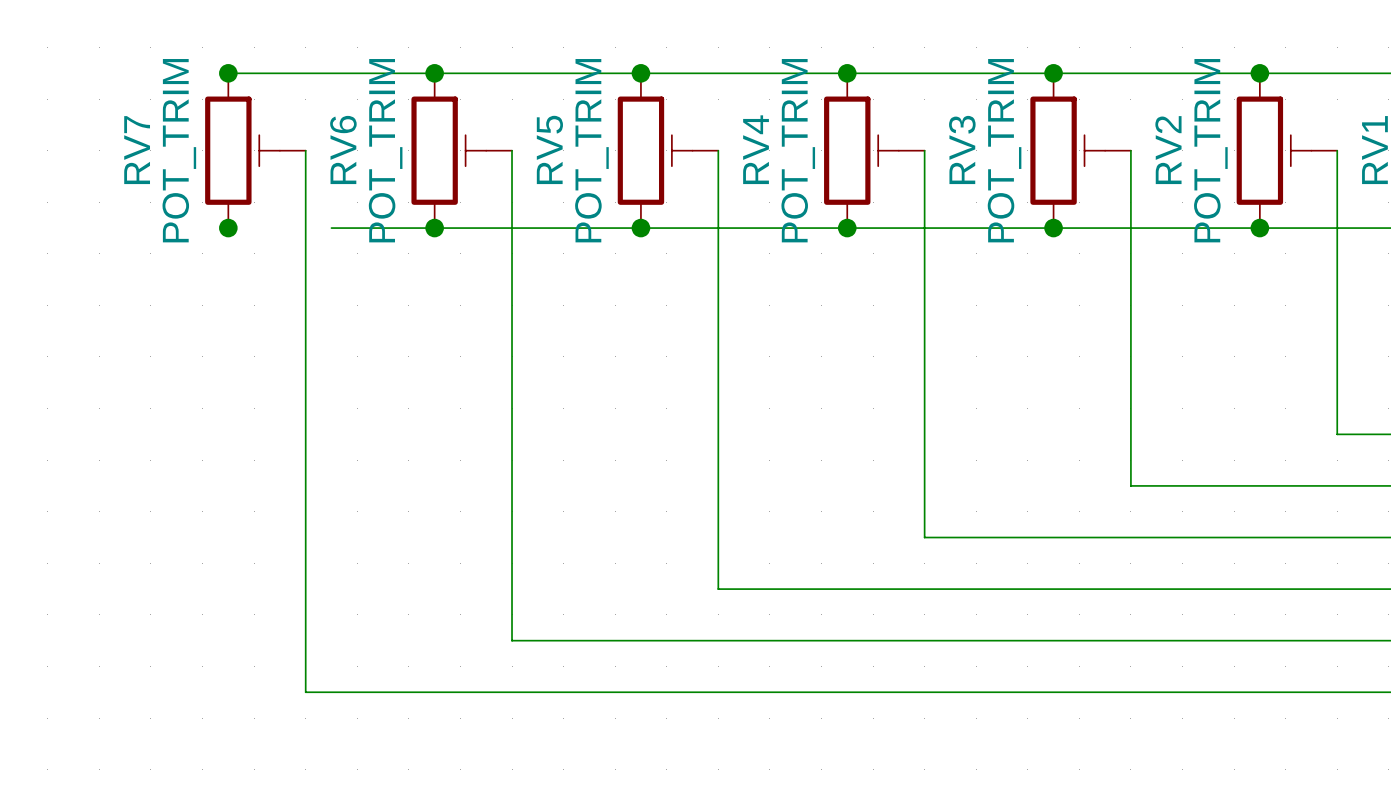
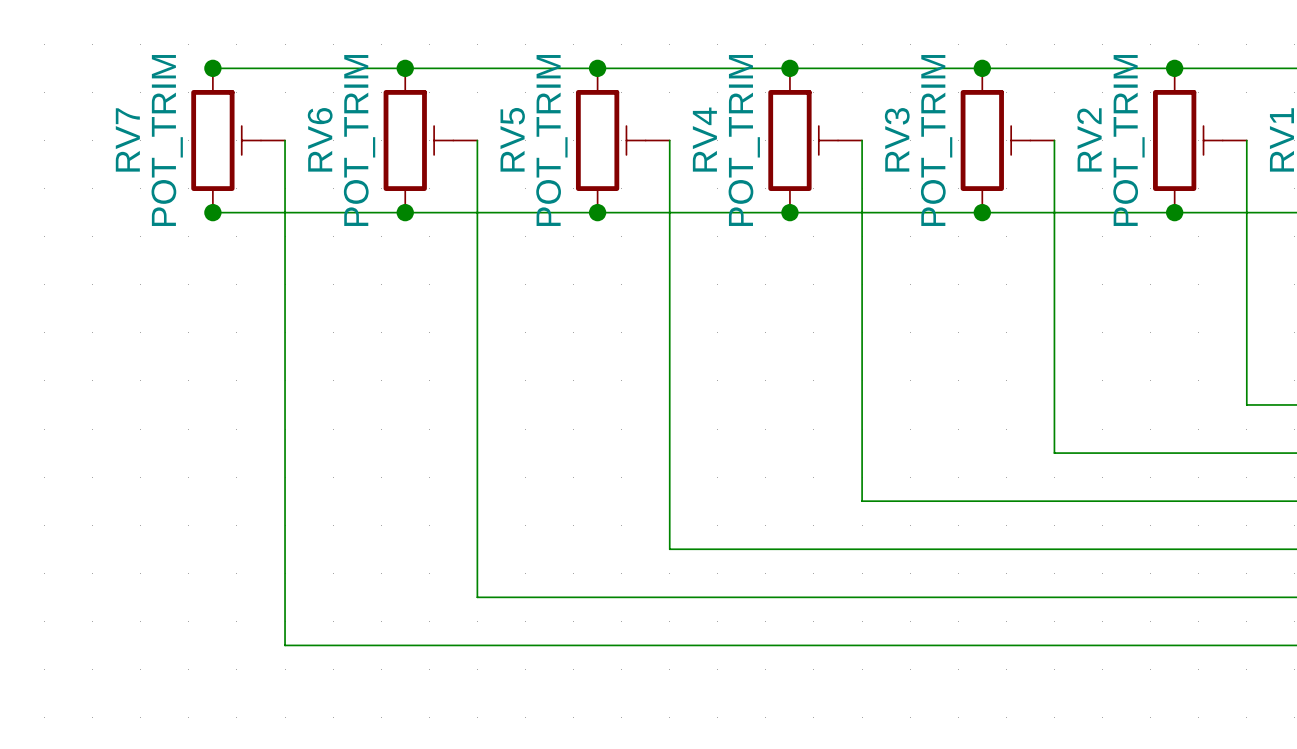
wire: none -> (212, 212) (309, 212)

